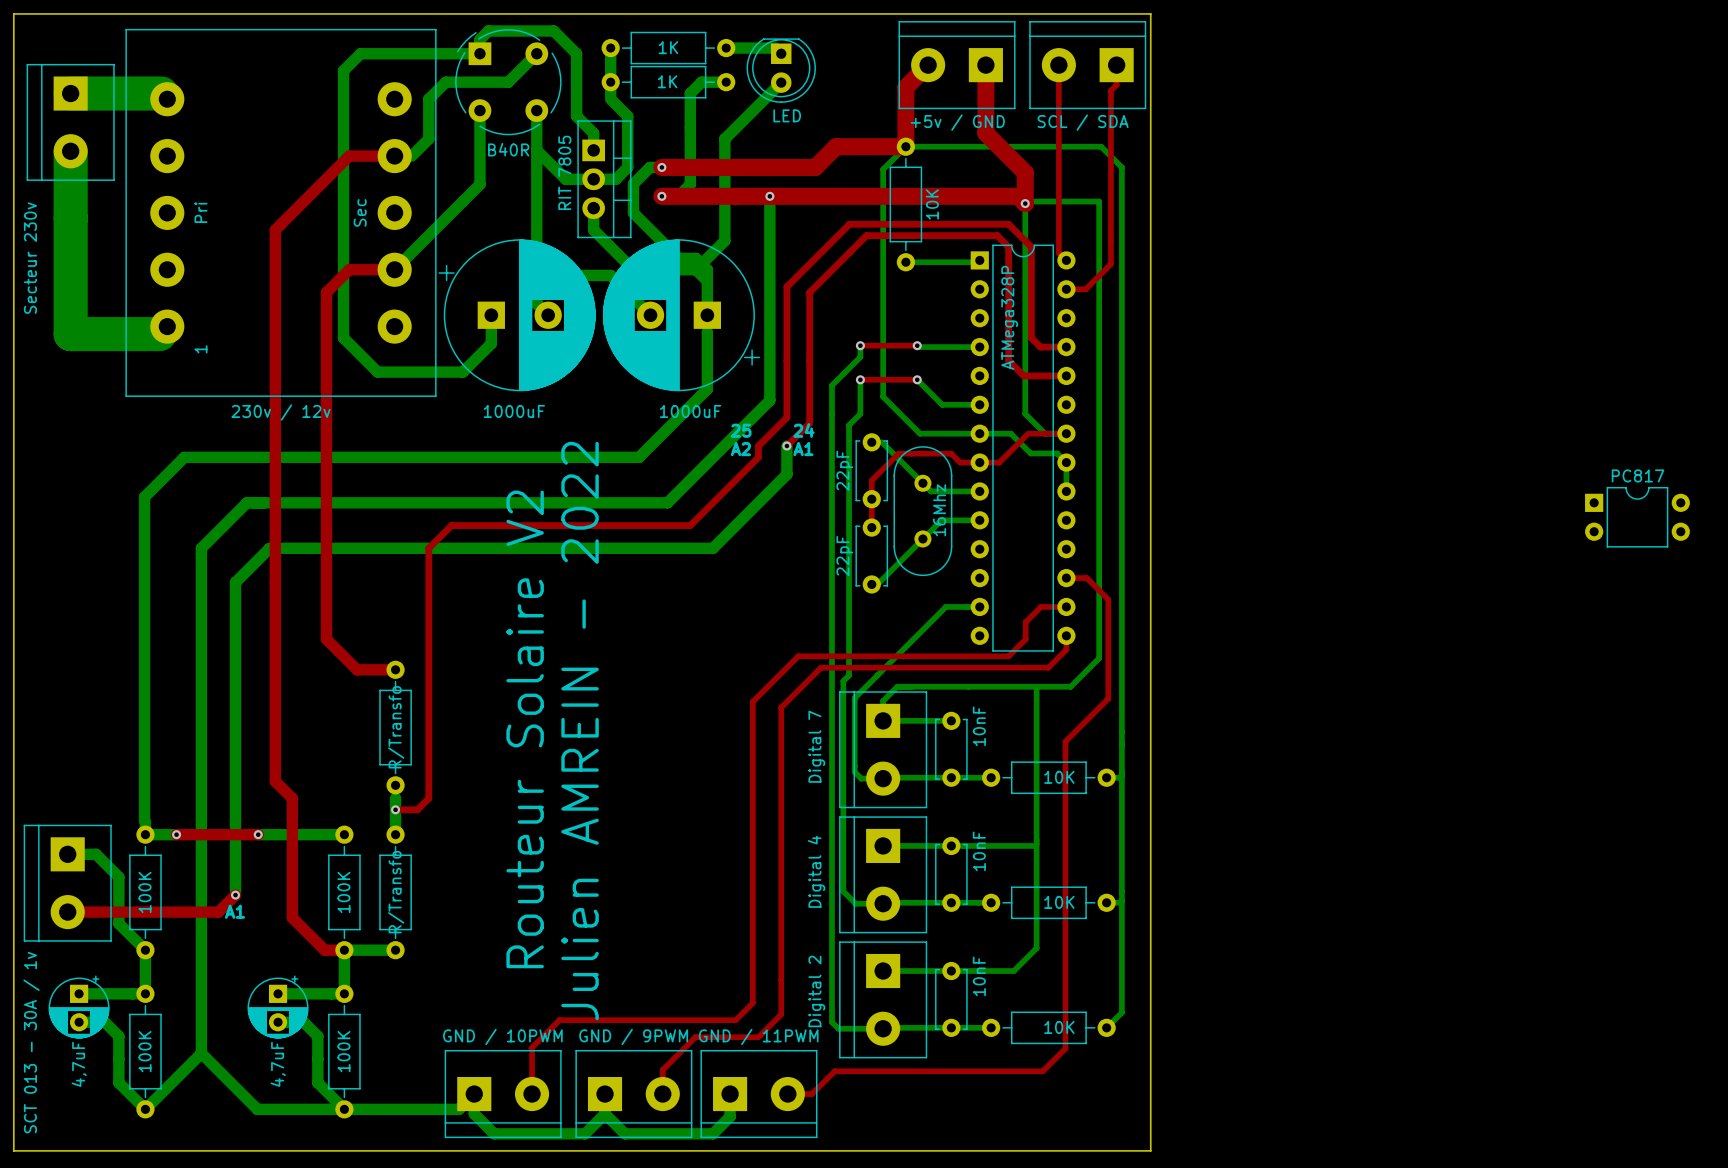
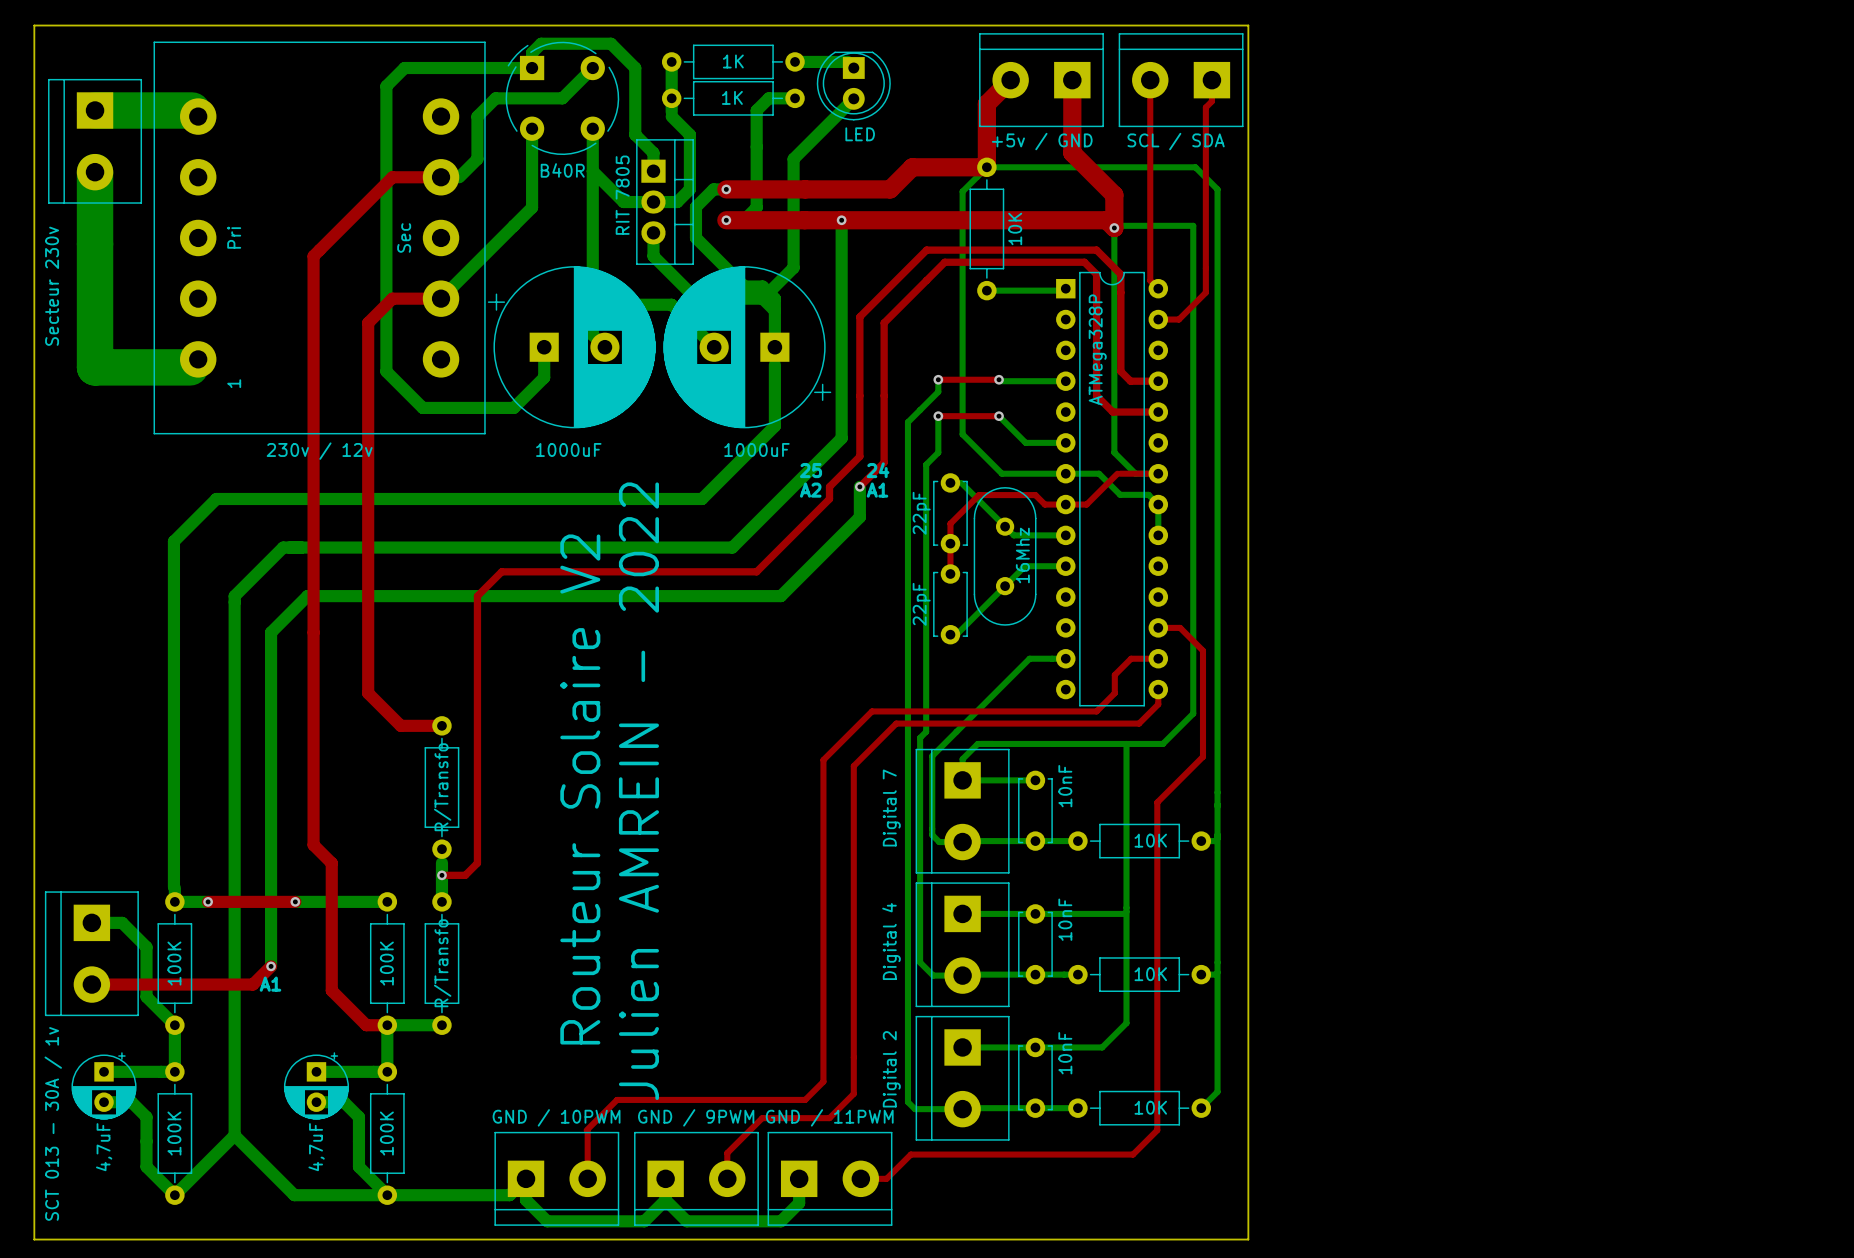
PC817: (1637, 517) -> none

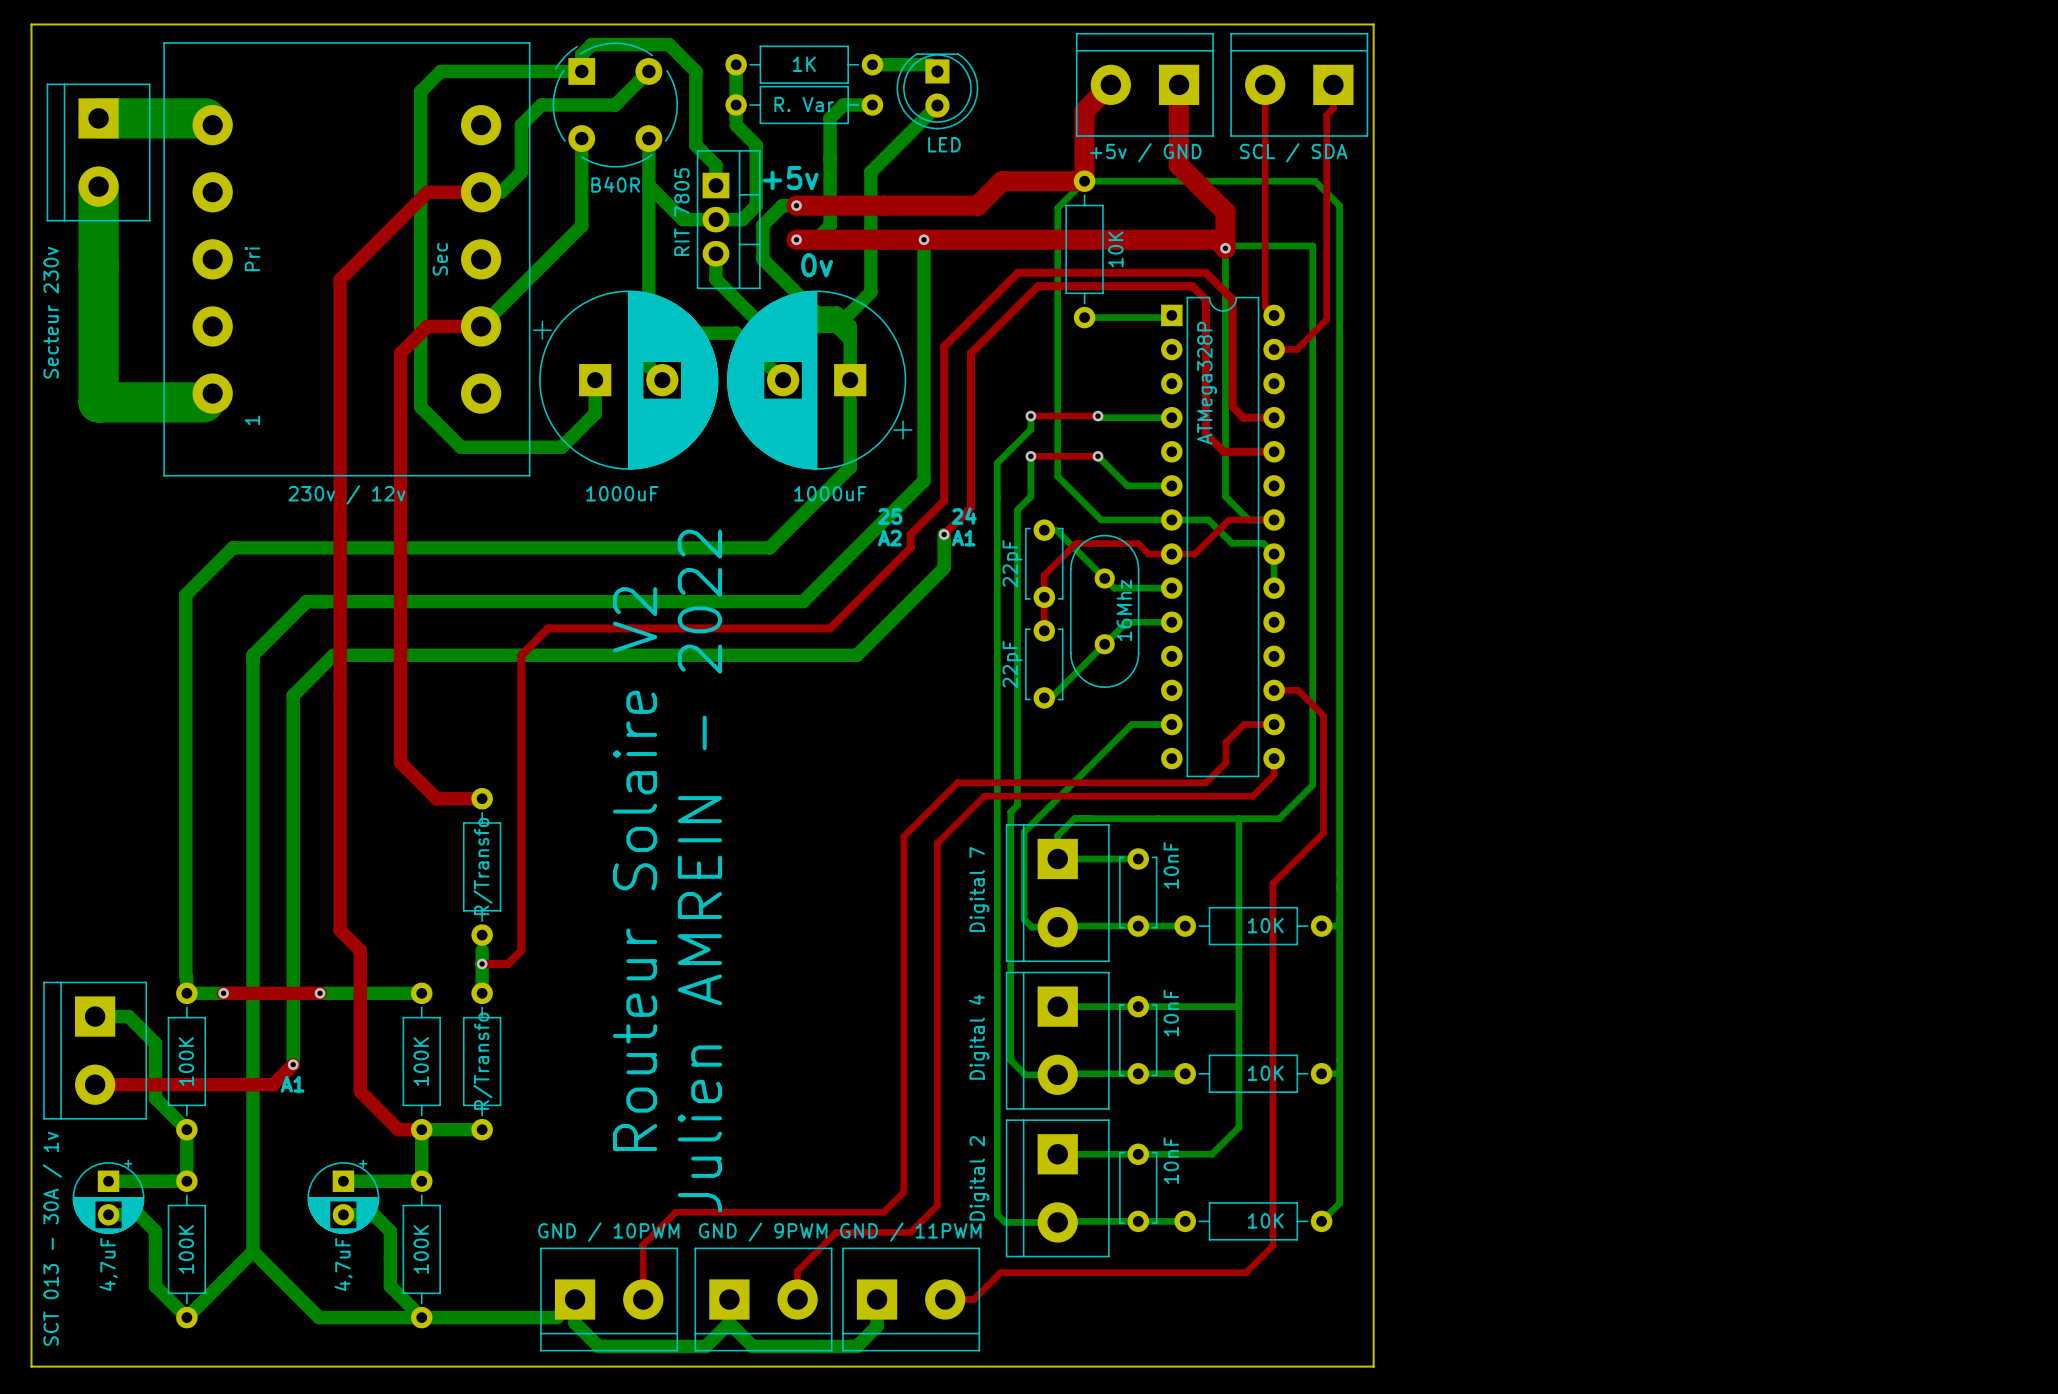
1K name: 1K (732, 97) -> R. Var (804, 104)
text: none -> +5v (790, 178)
text: none -> 0v (817, 265)

